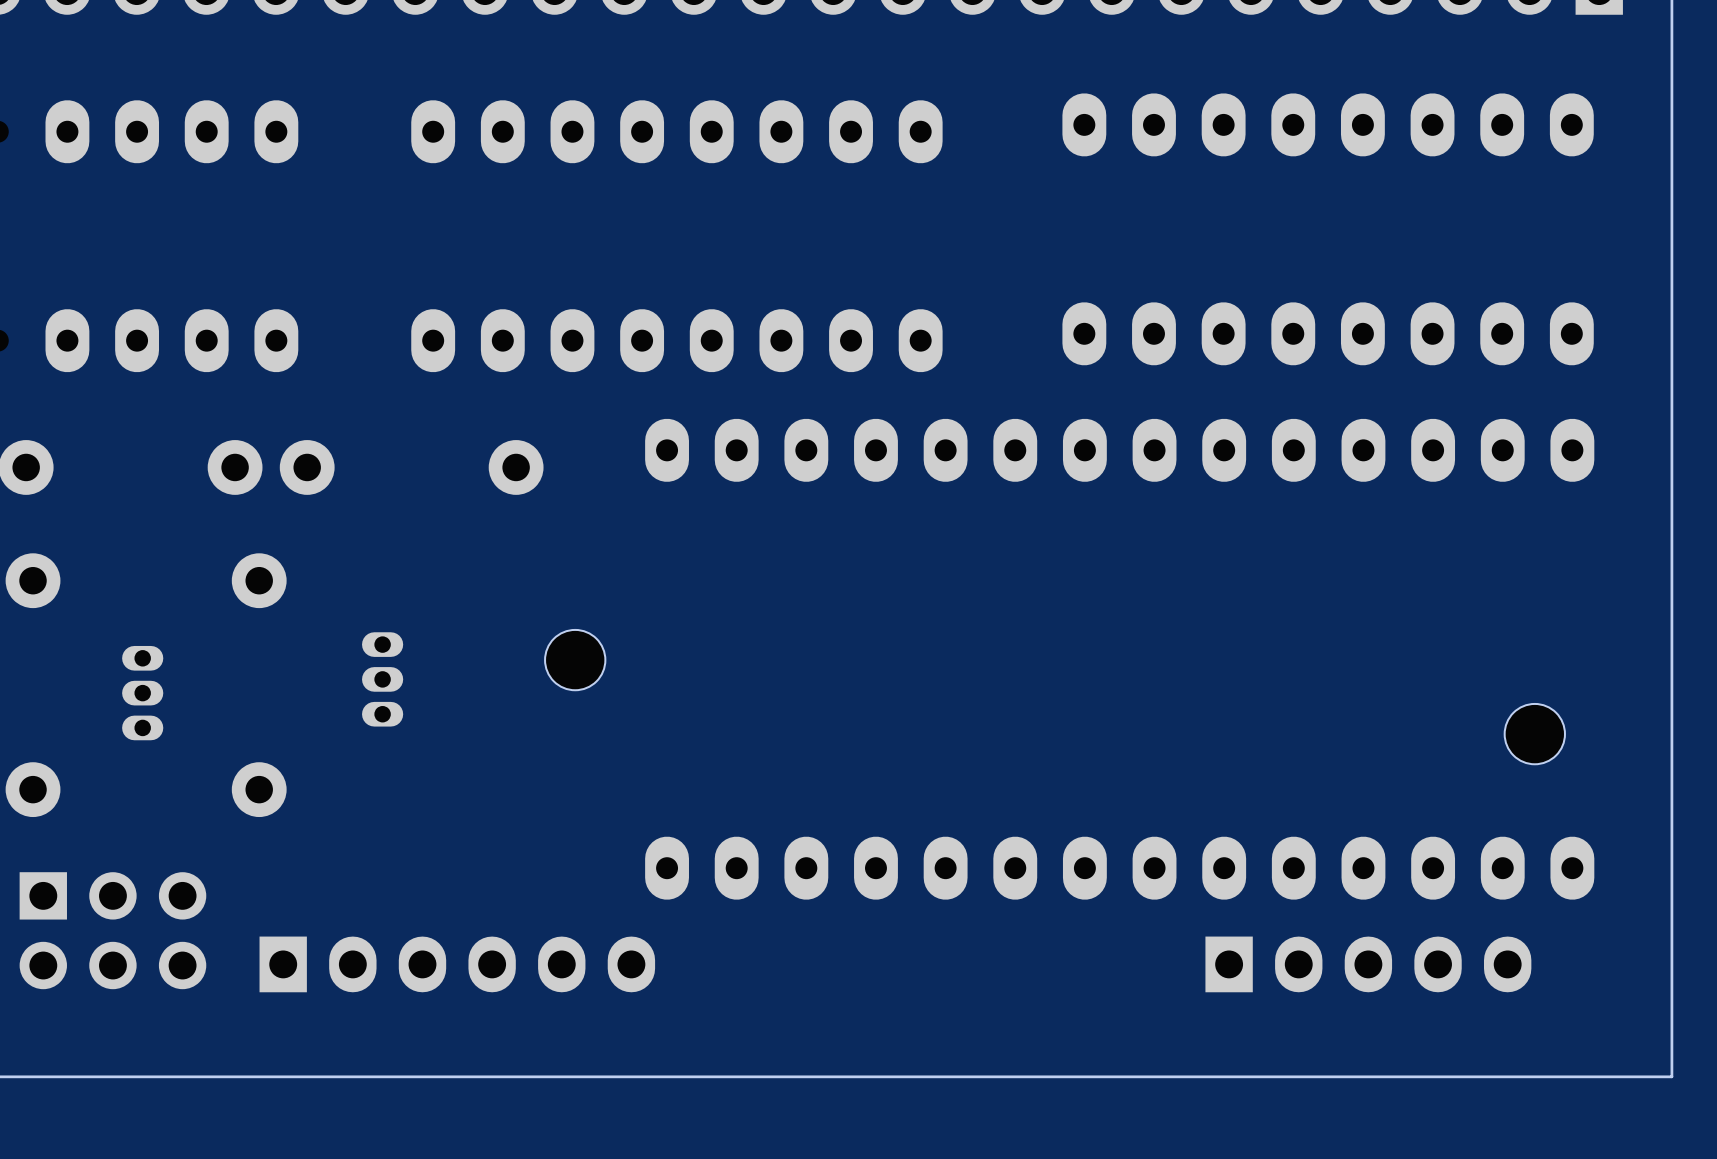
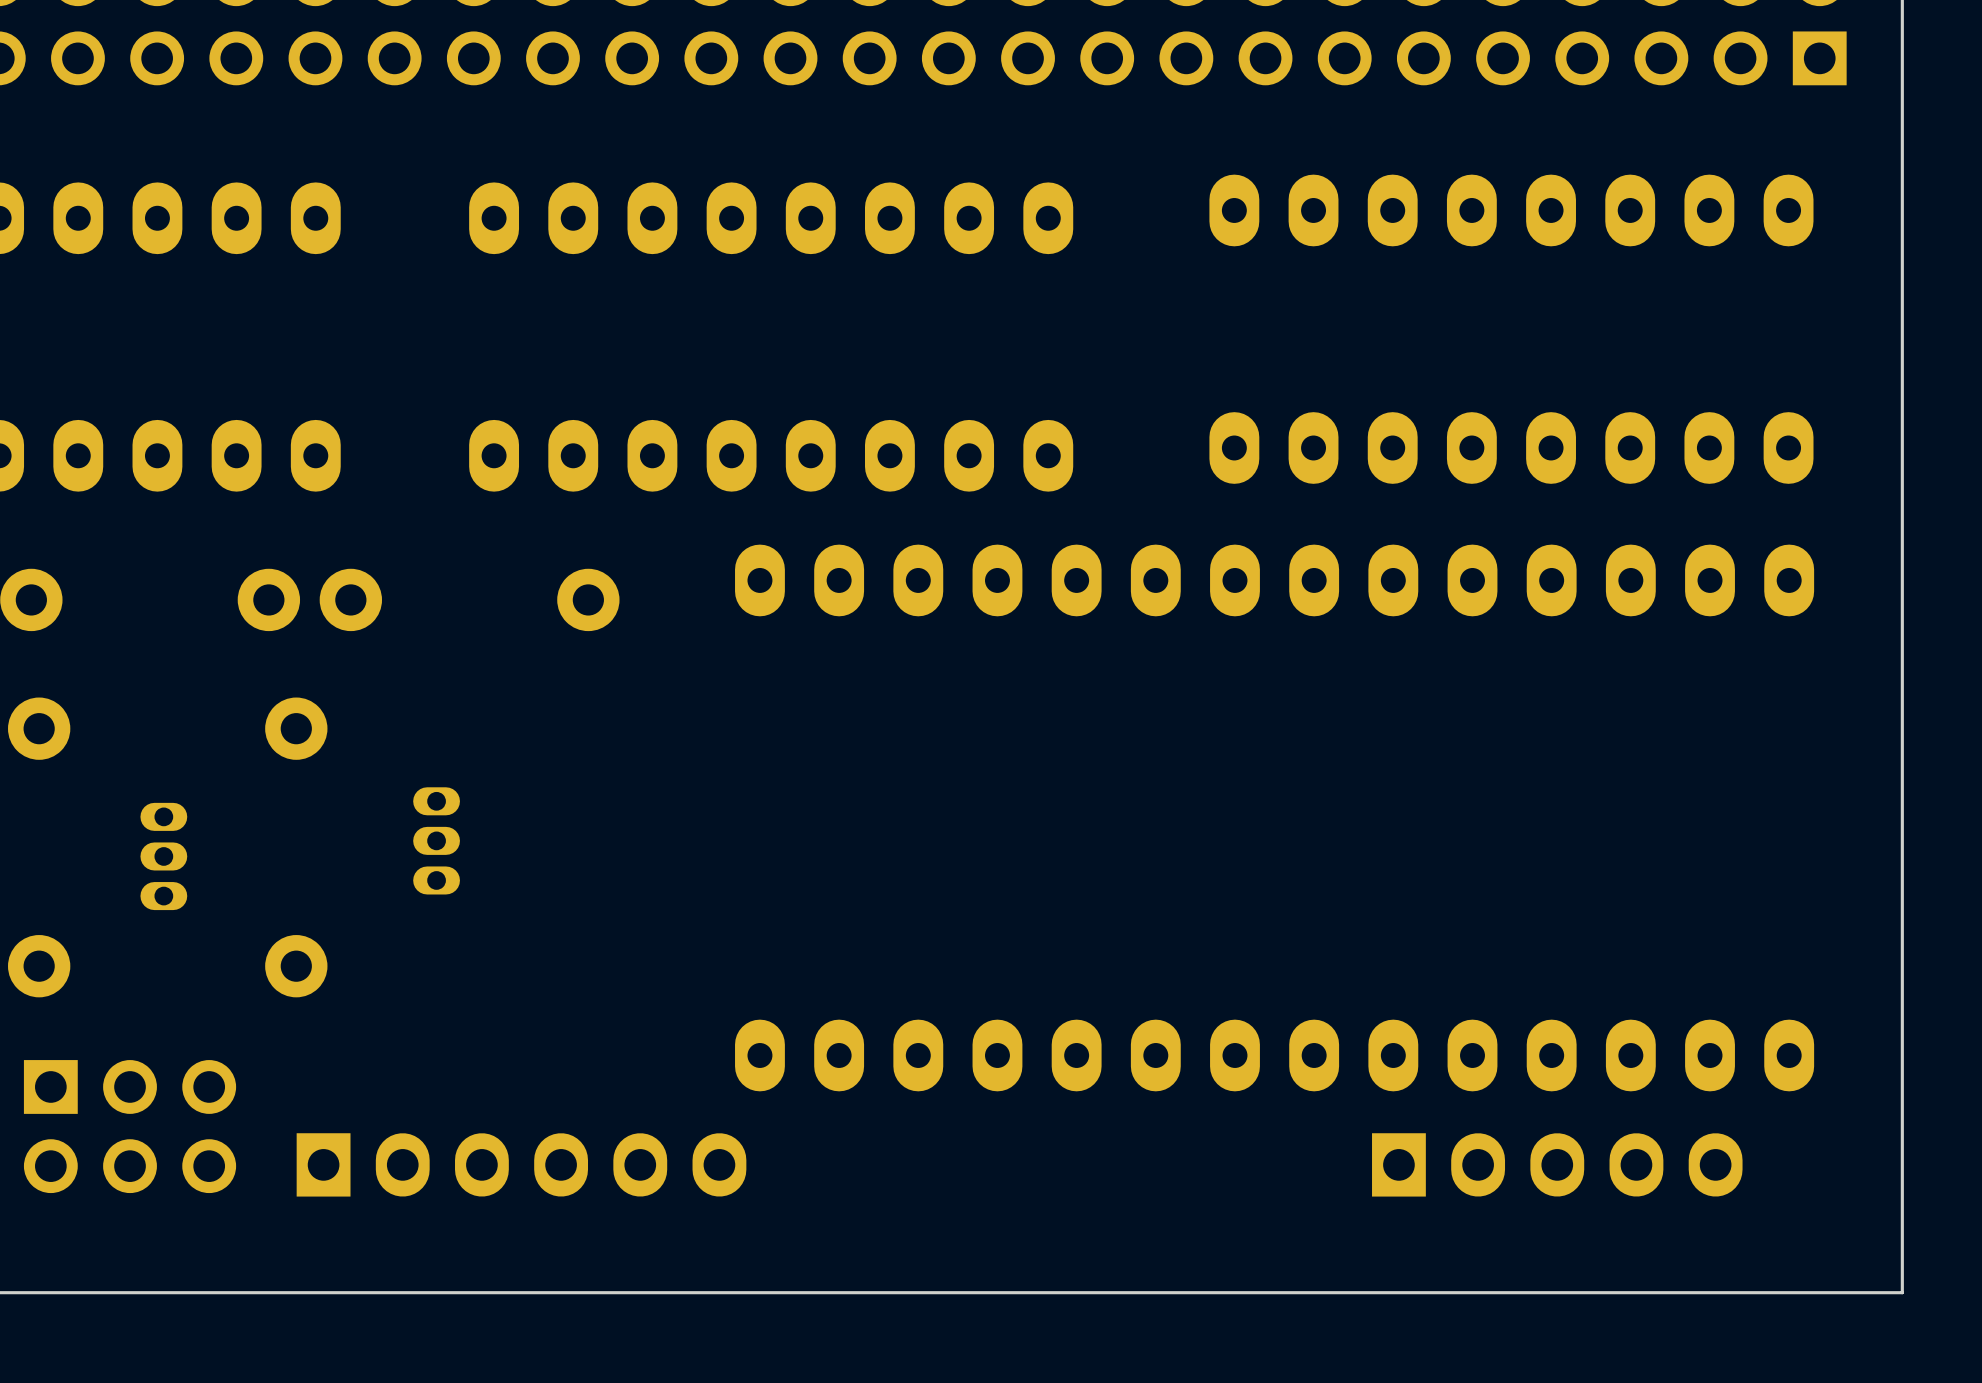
part: (575, 660) -> none
part: (1534, 734) -> none

